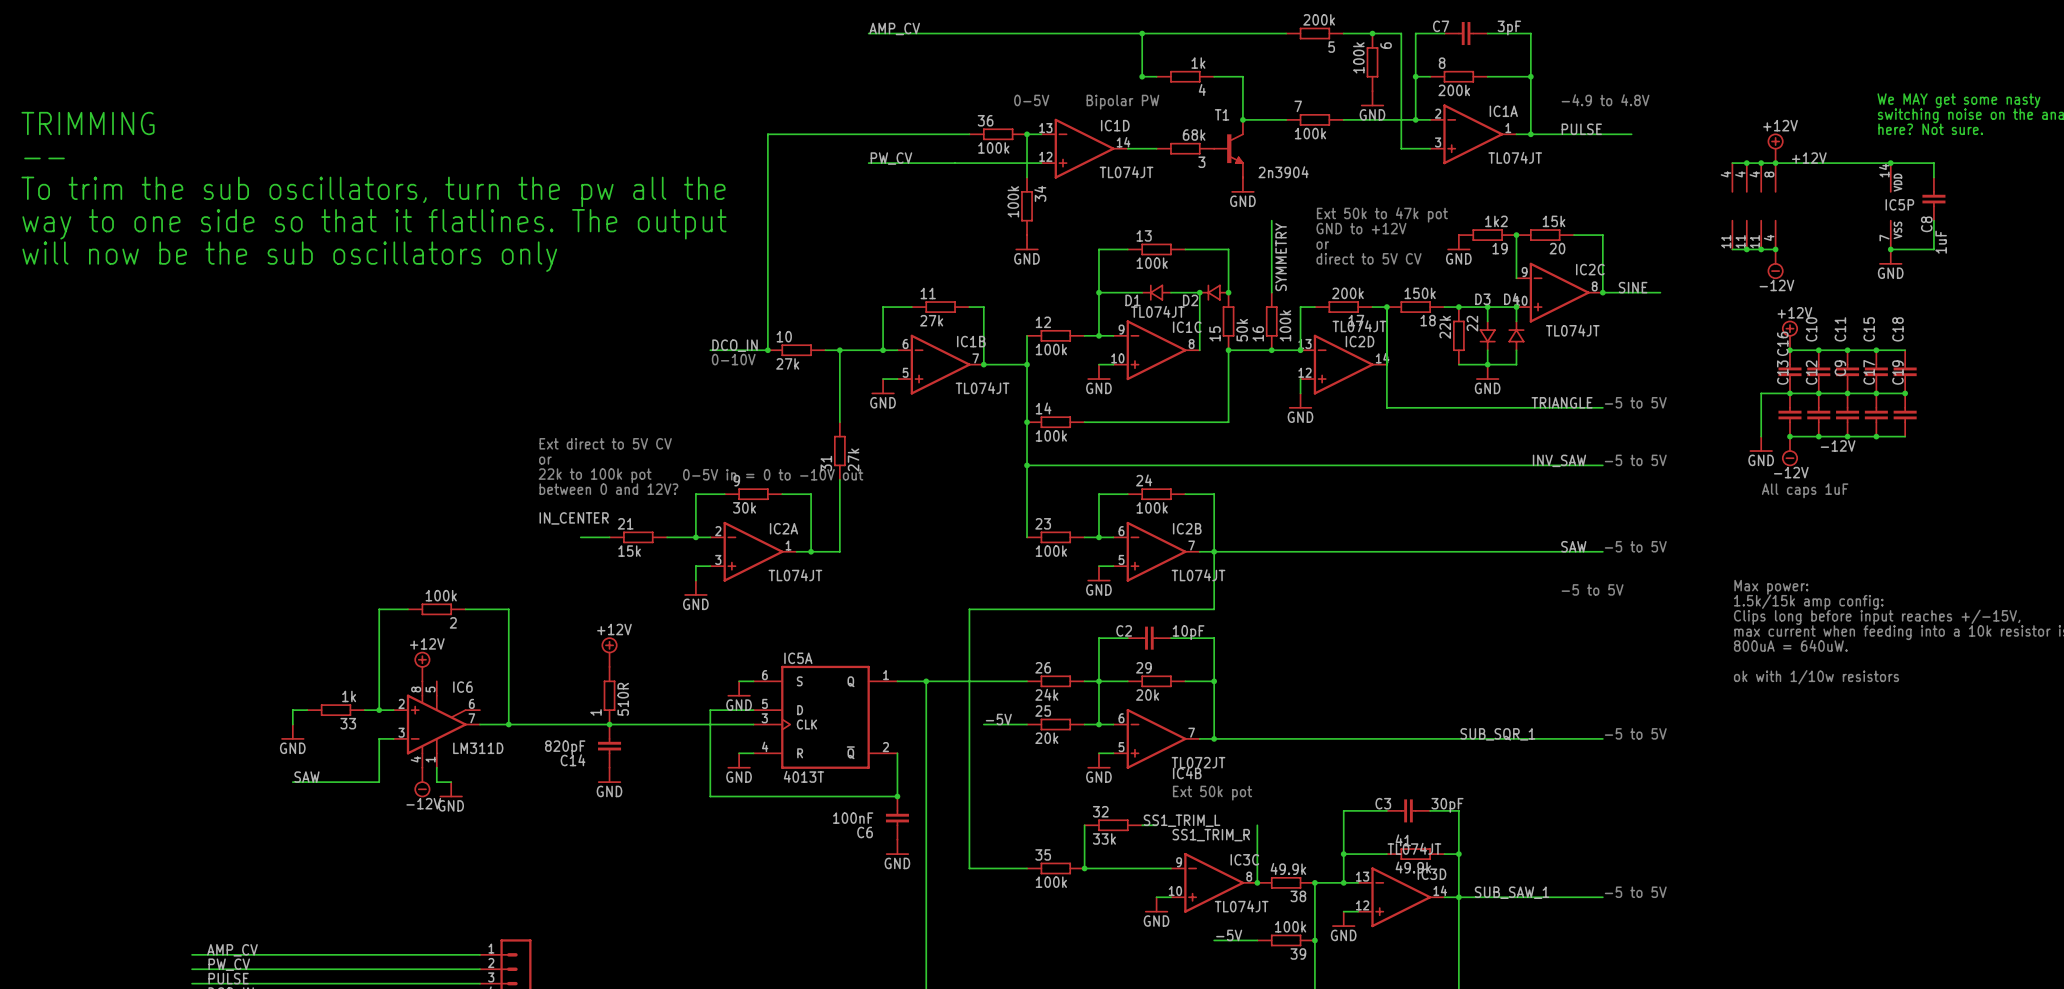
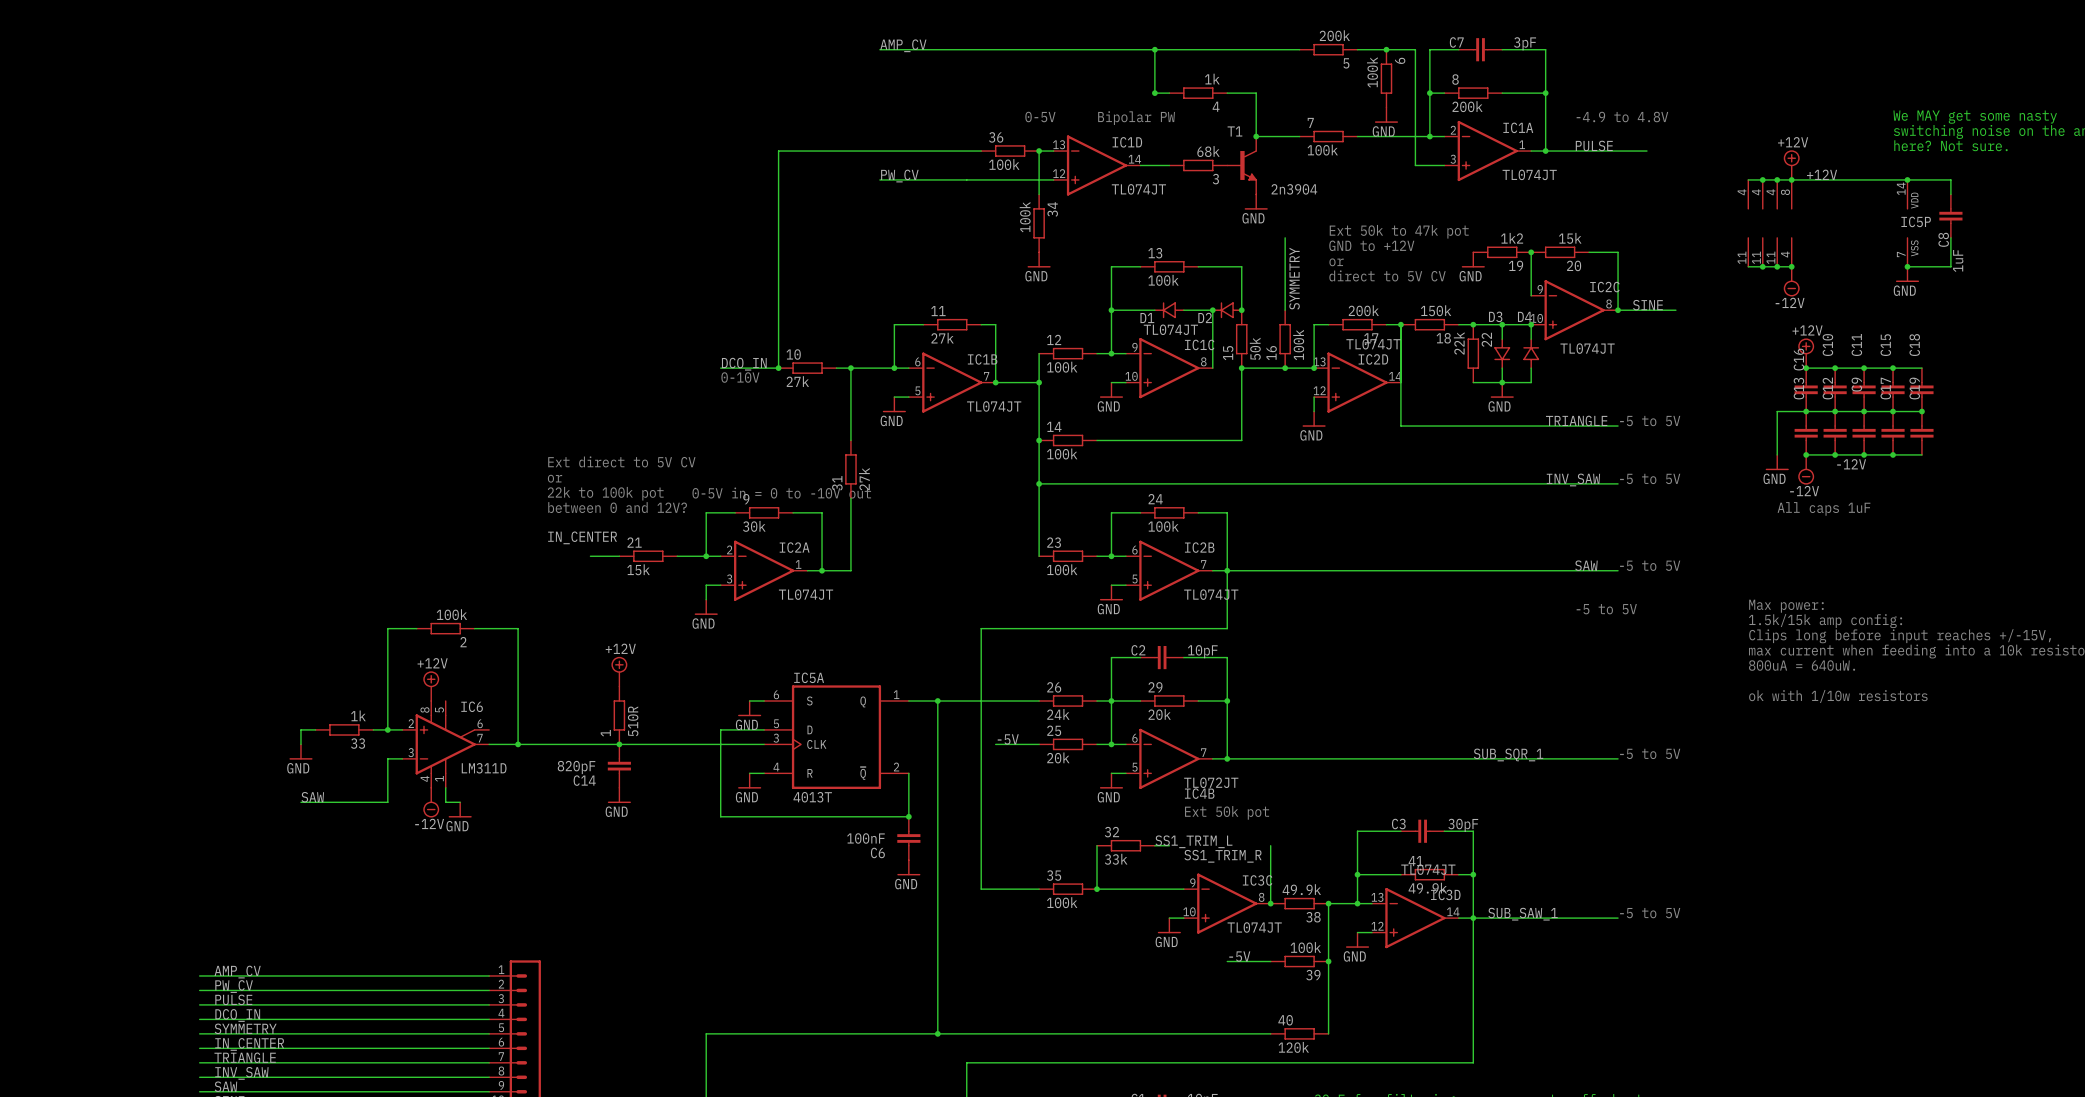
text: TRIMMING (88, 123) -> none
text: -- (44, 158) -> none
text: To trim the sub oscillators, turn the pw all the (373, 191) -> none
text: way to one side so that it flatlines. The output (374, 224) -> none
text: will now be the sub oscillators only (289, 256) -> none

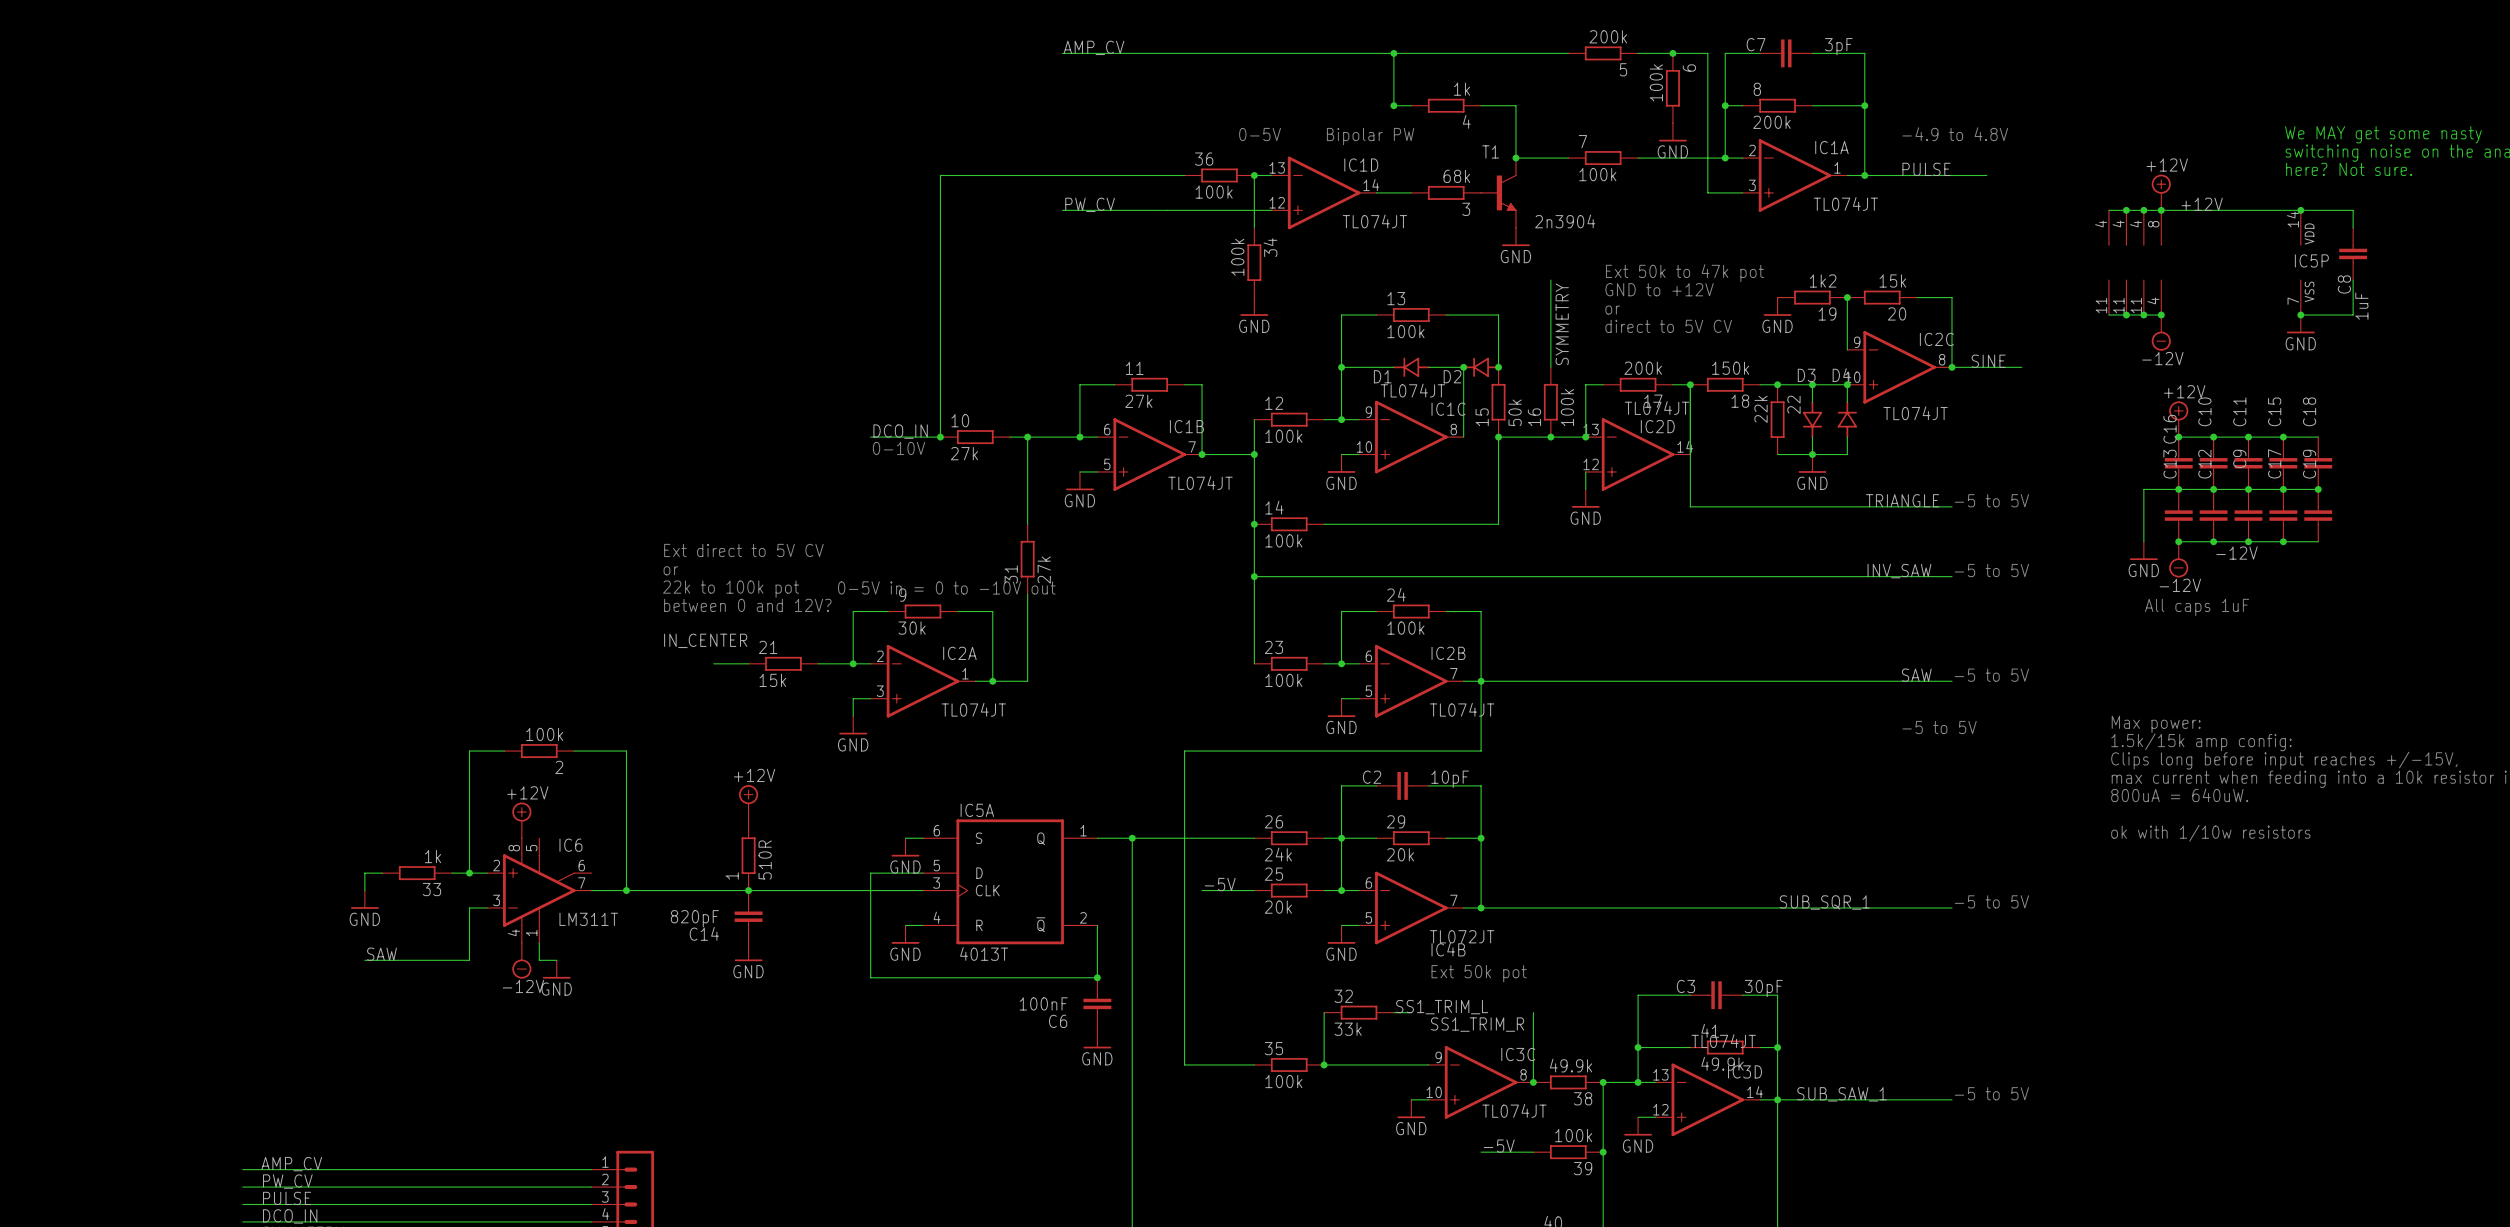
IC6 value: LM311D (484, 768) -> LM311T (588, 919)

